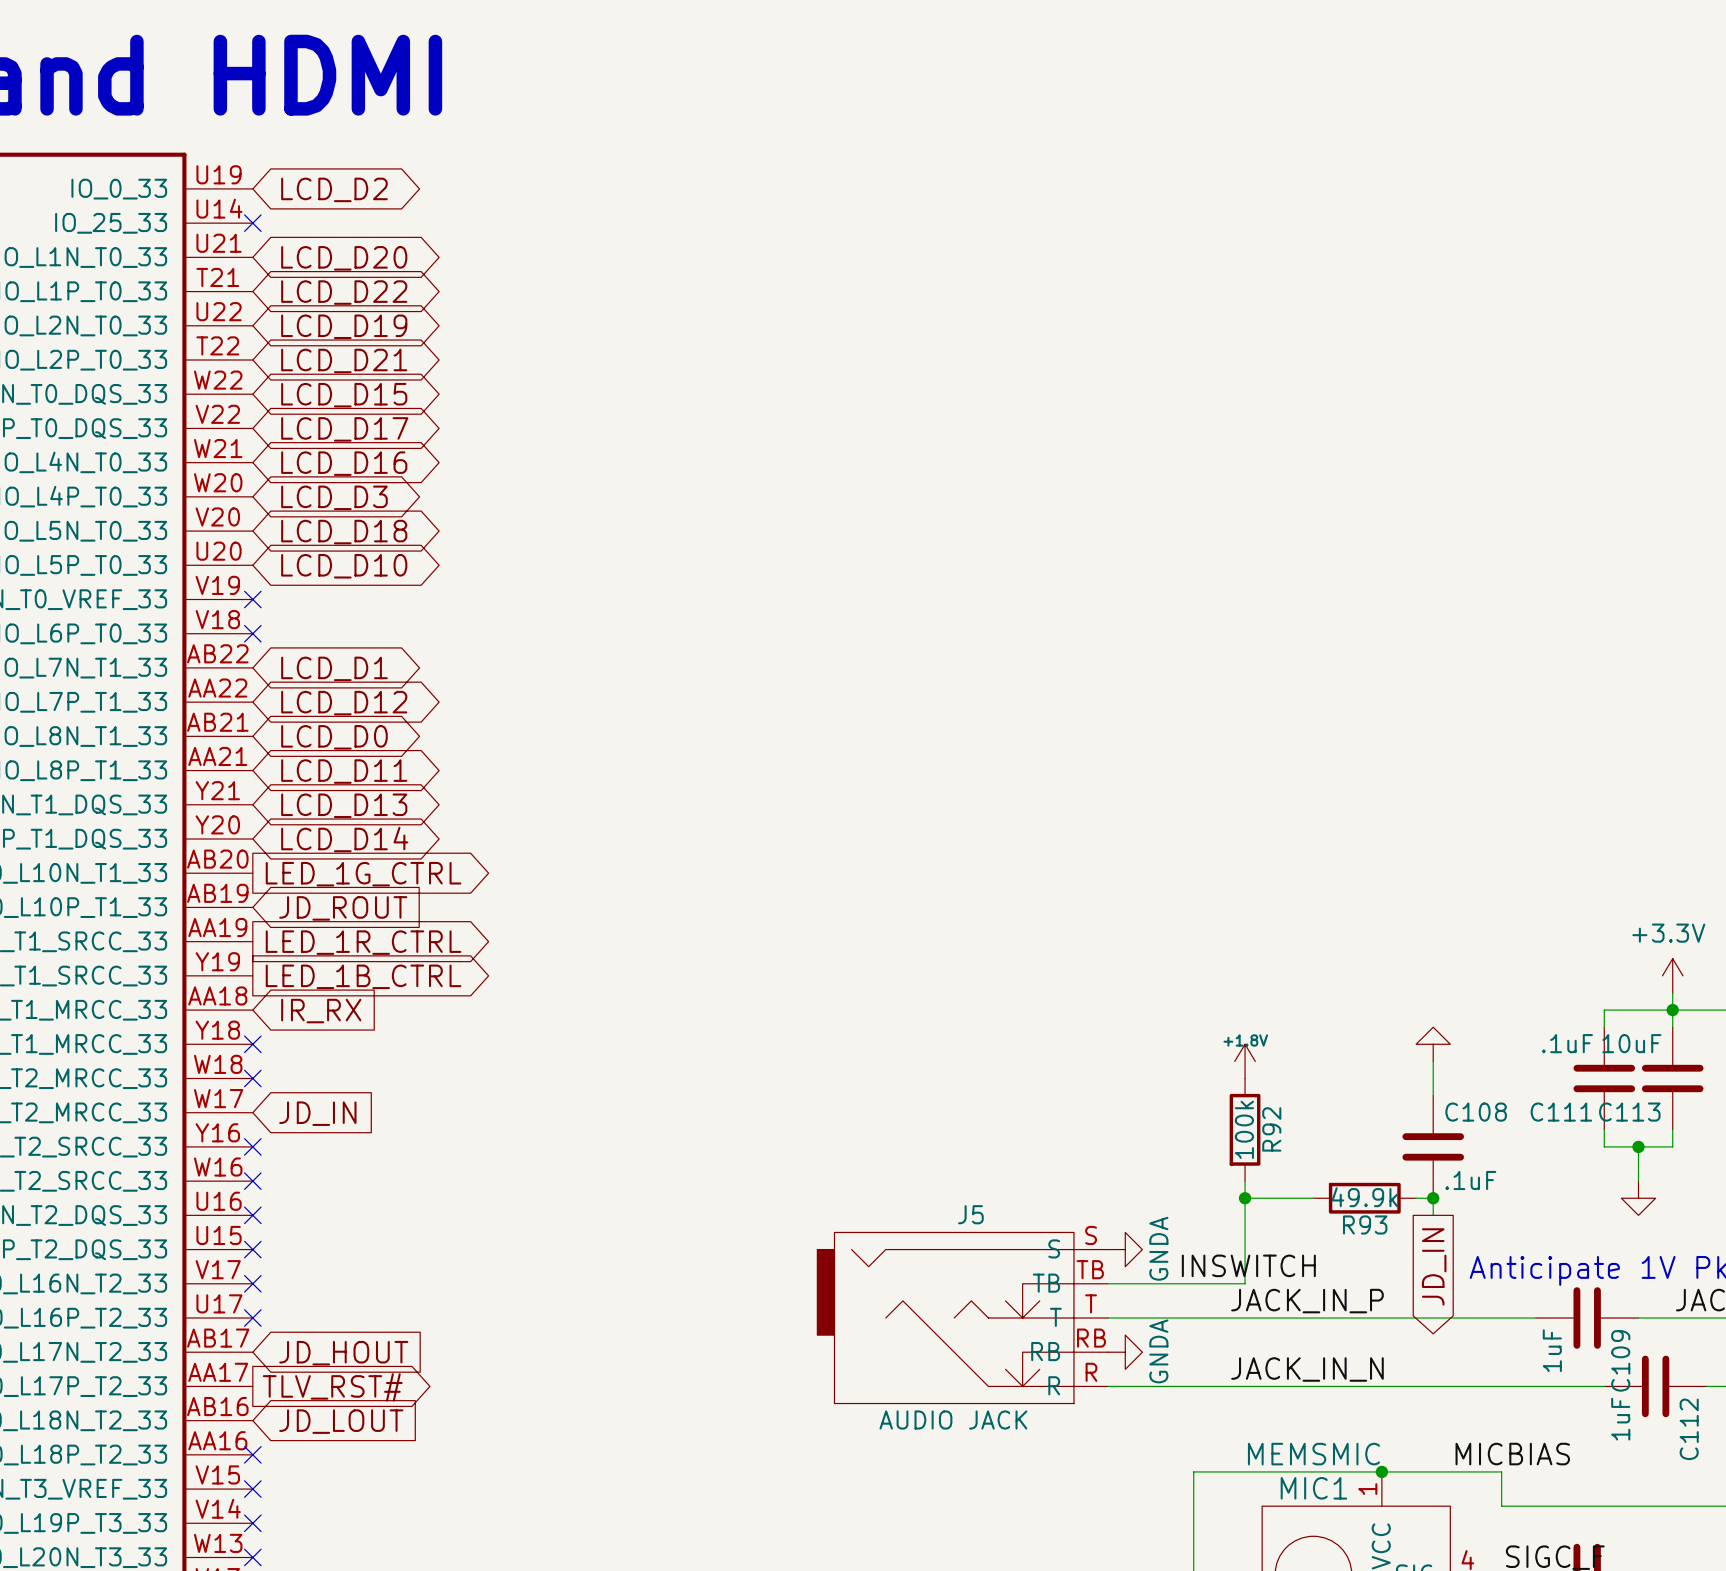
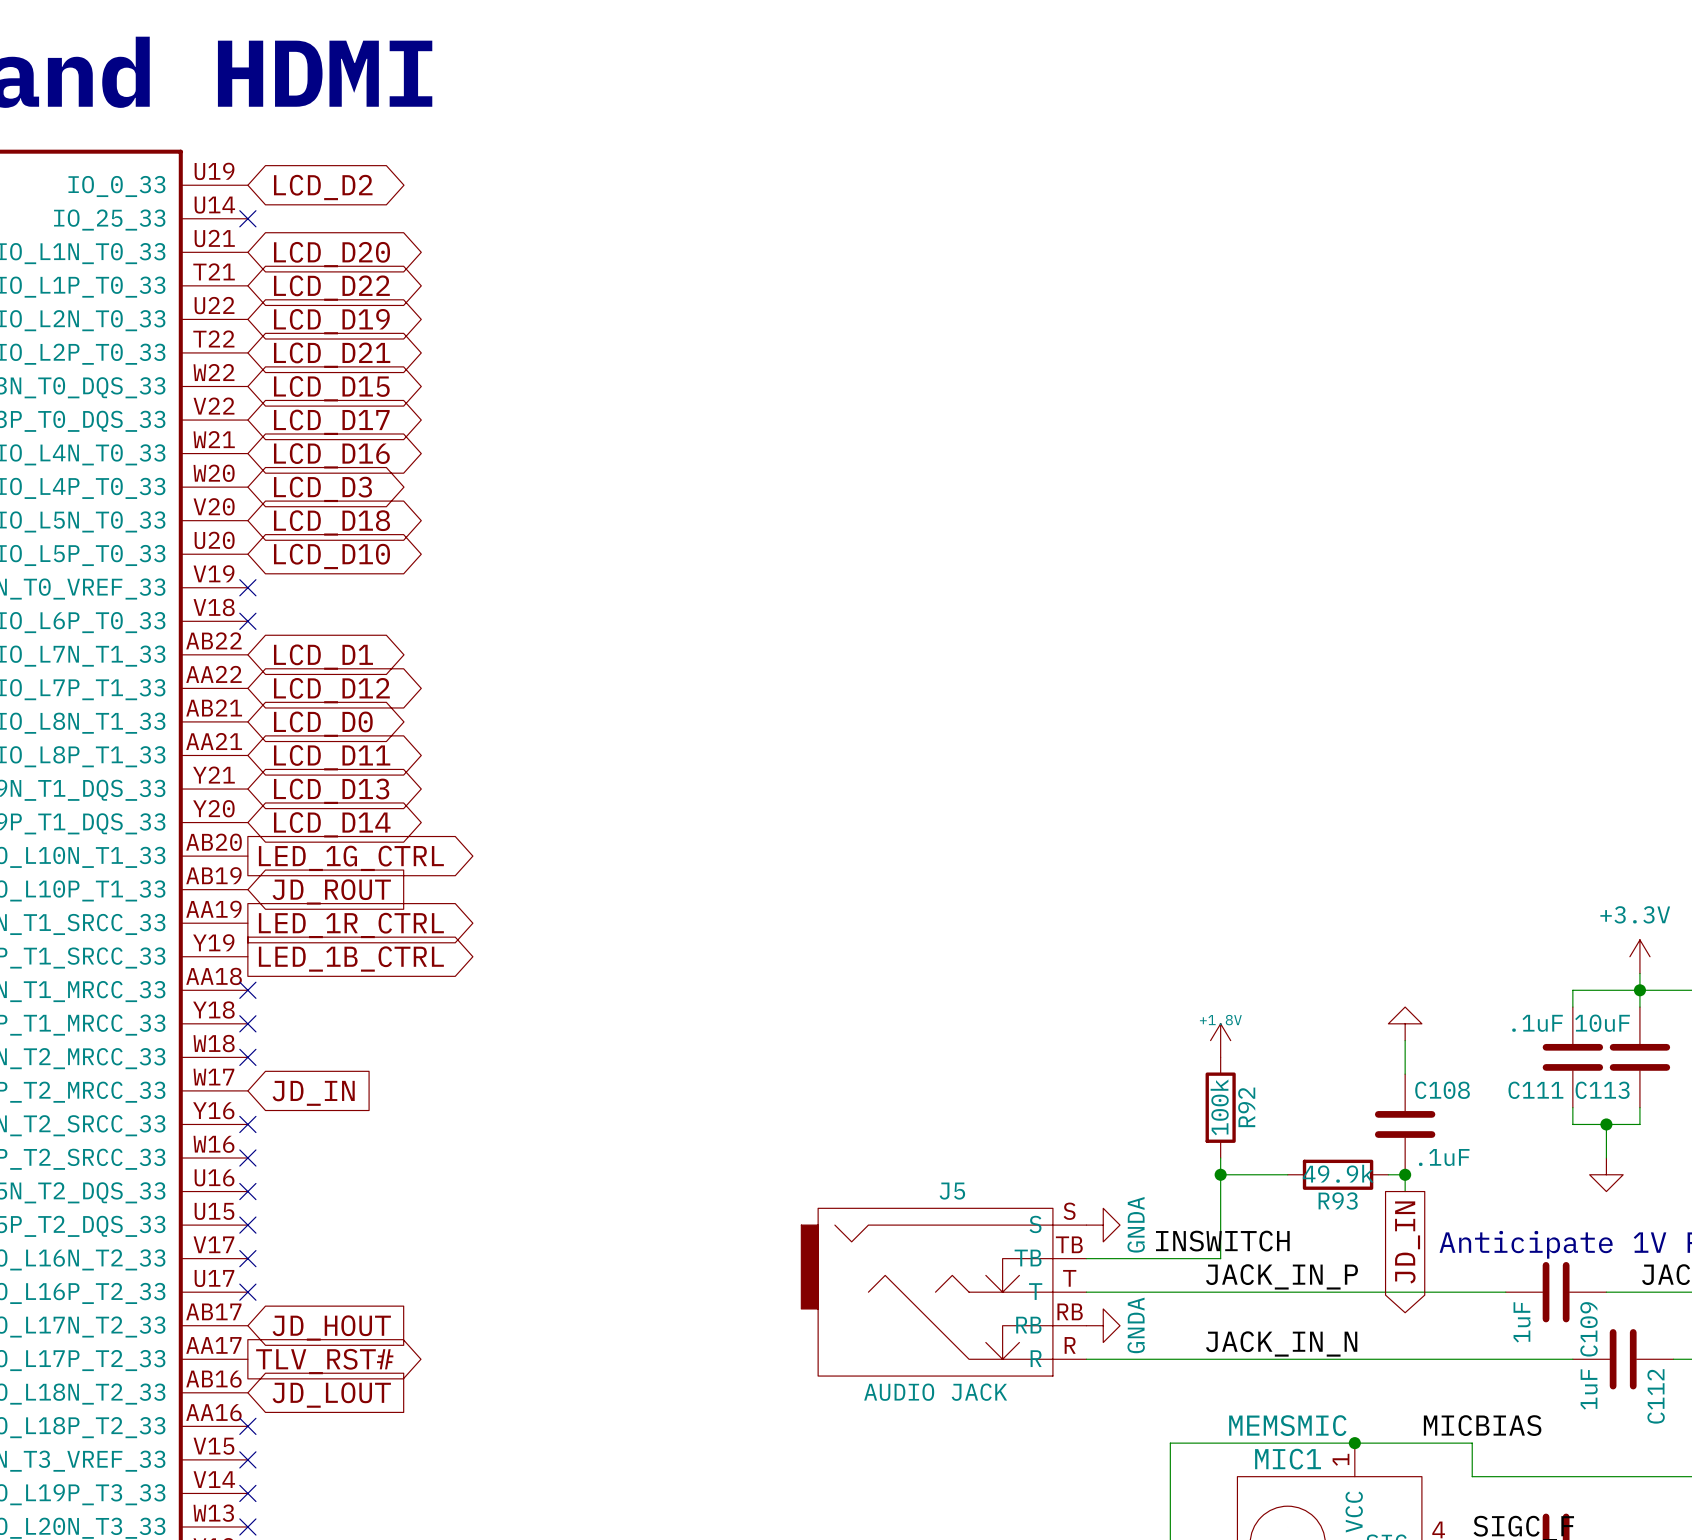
no-connect mark: none -> (247, 990)
global label: IR_RX (321, 1011) -> none

